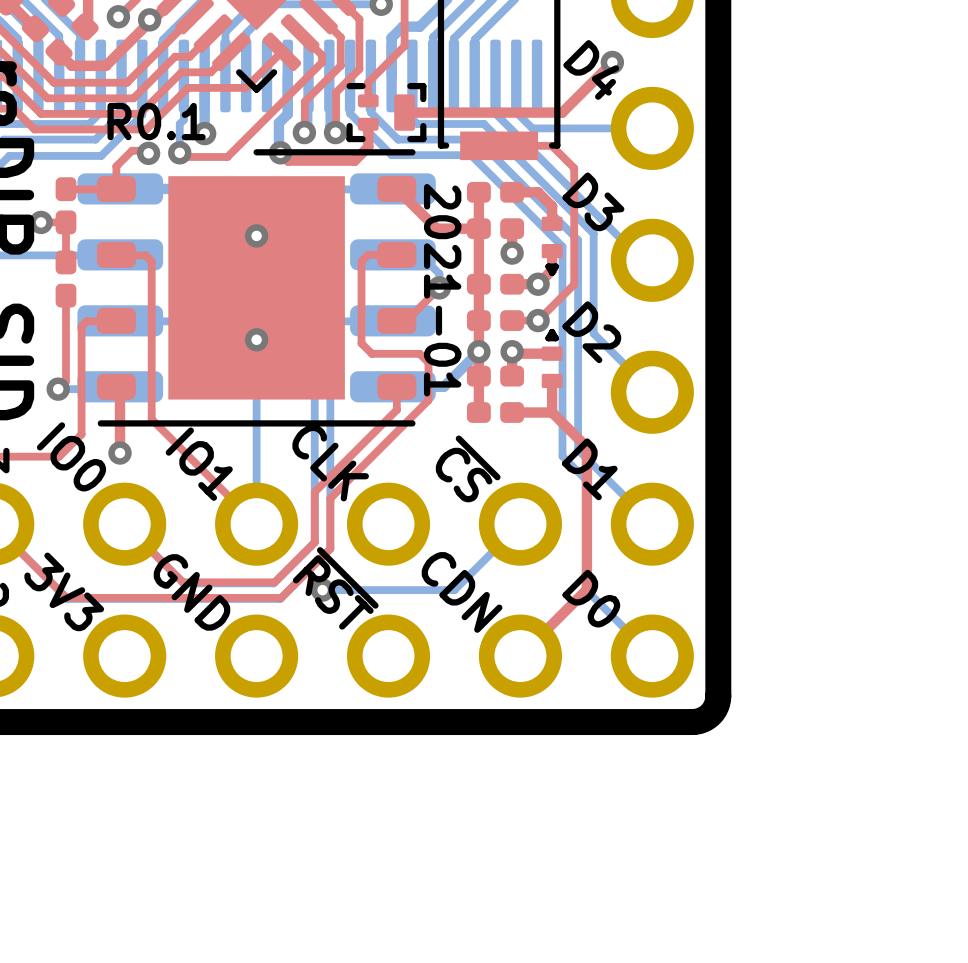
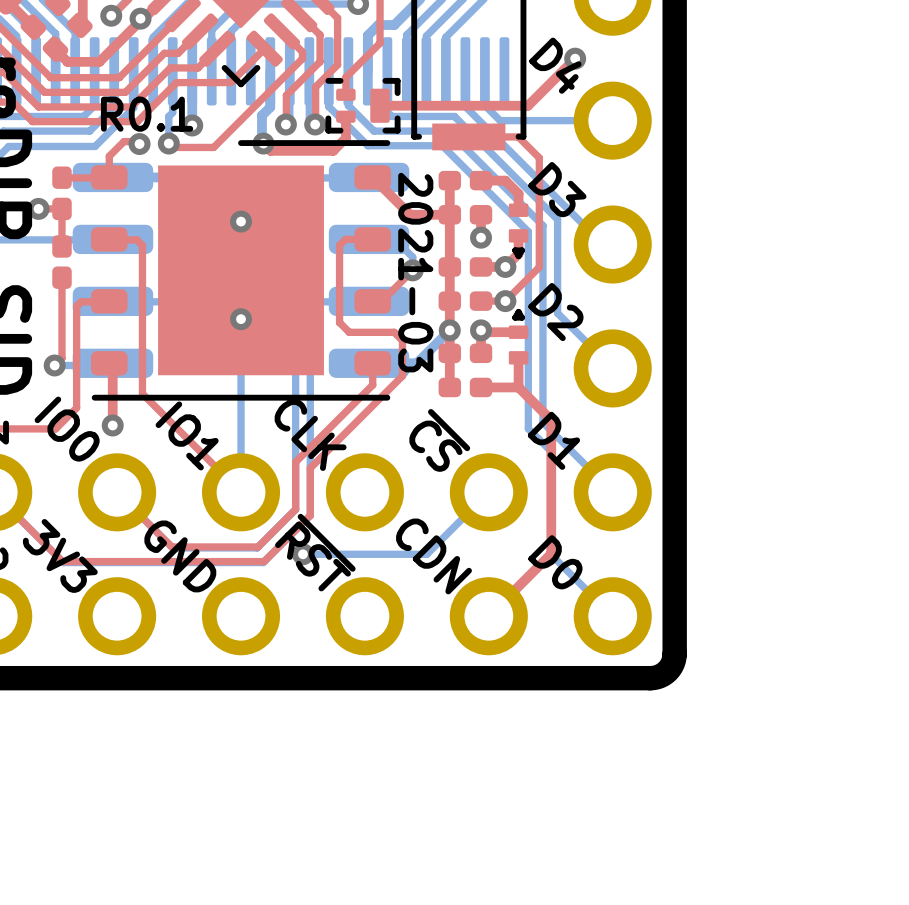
text: 2021-01 (442, 290) -> 2021-03 (415, 272)

